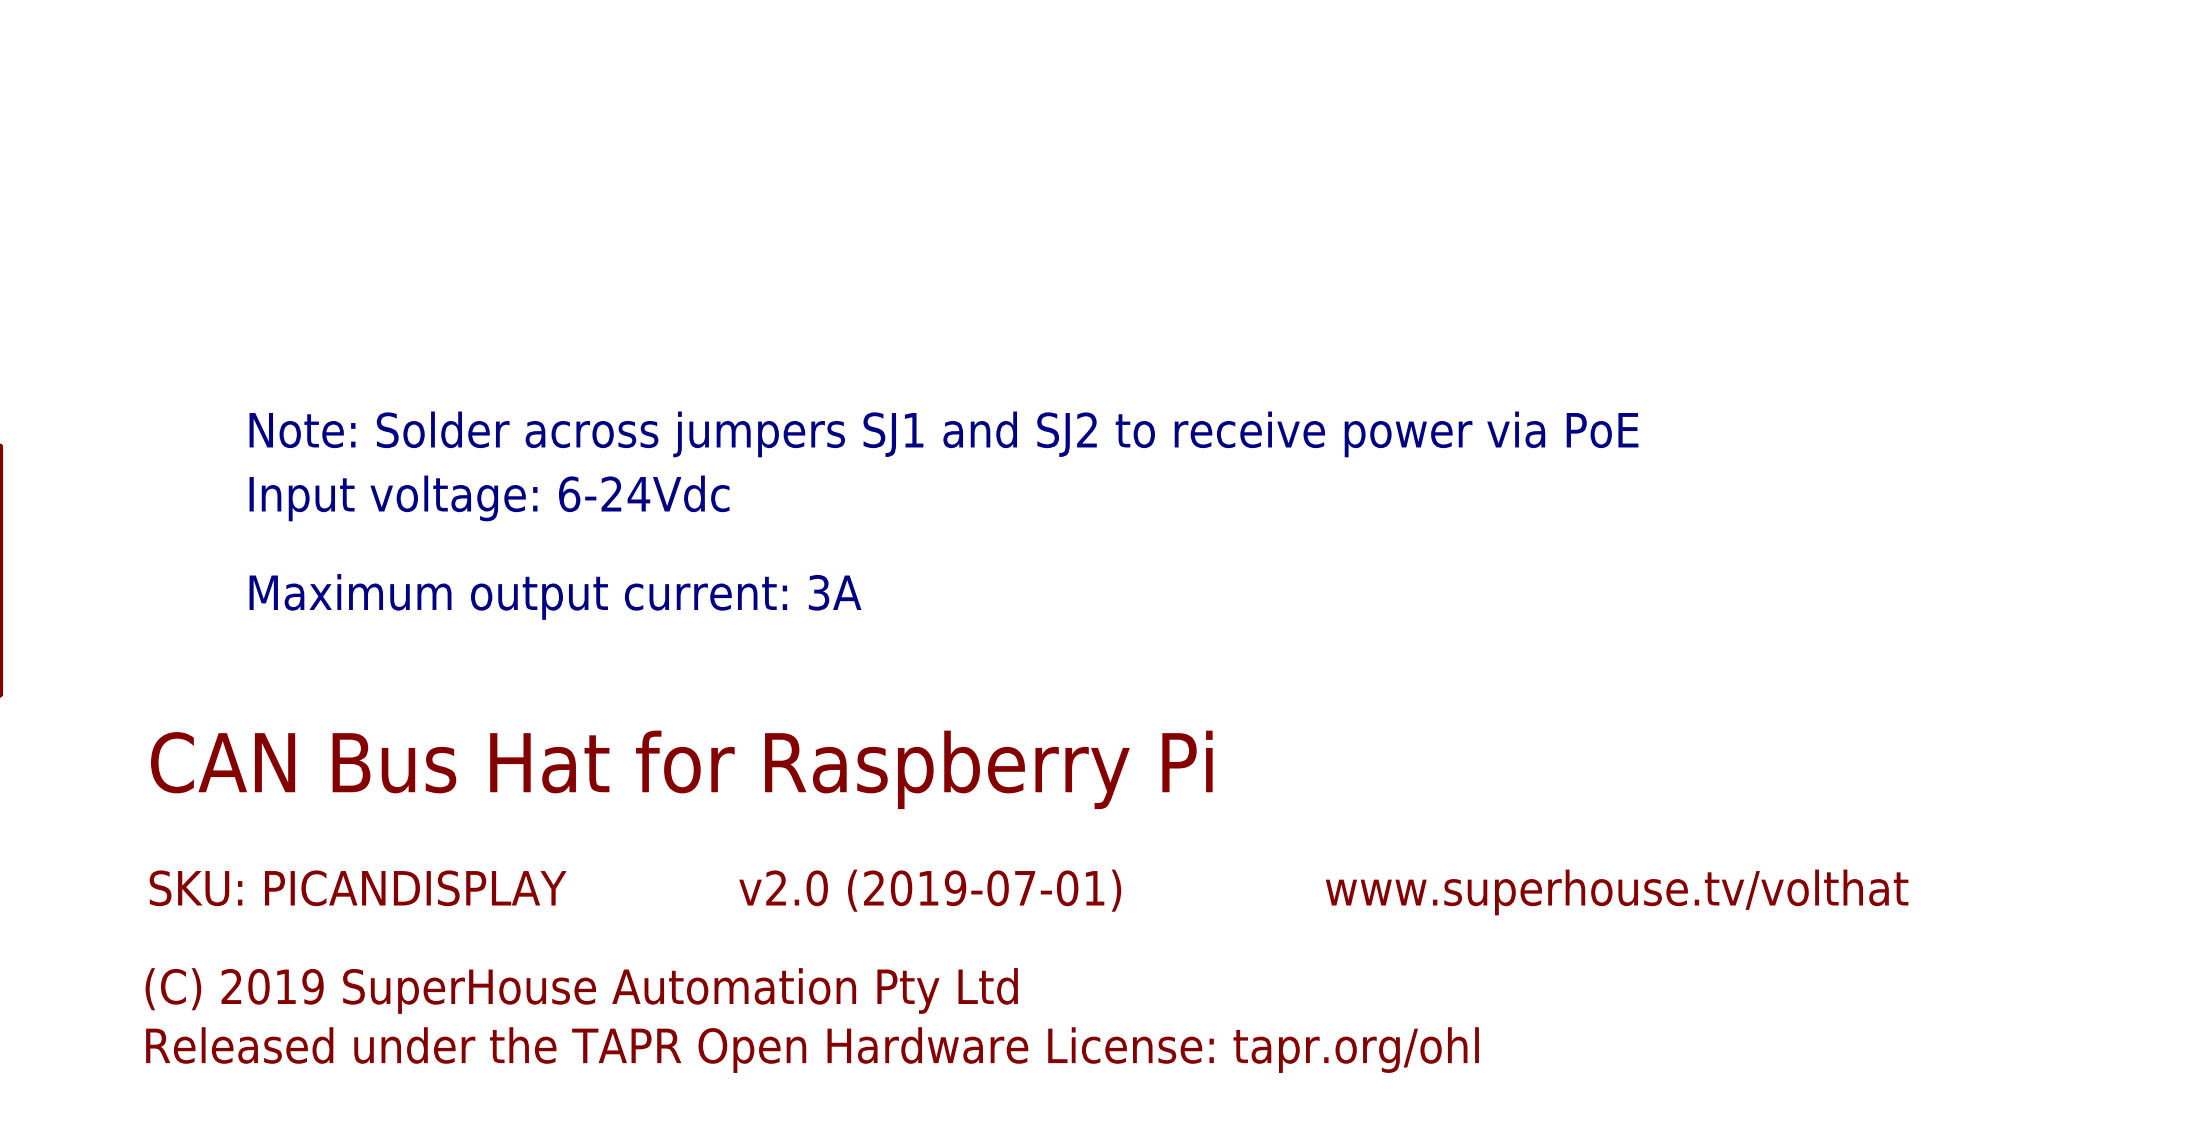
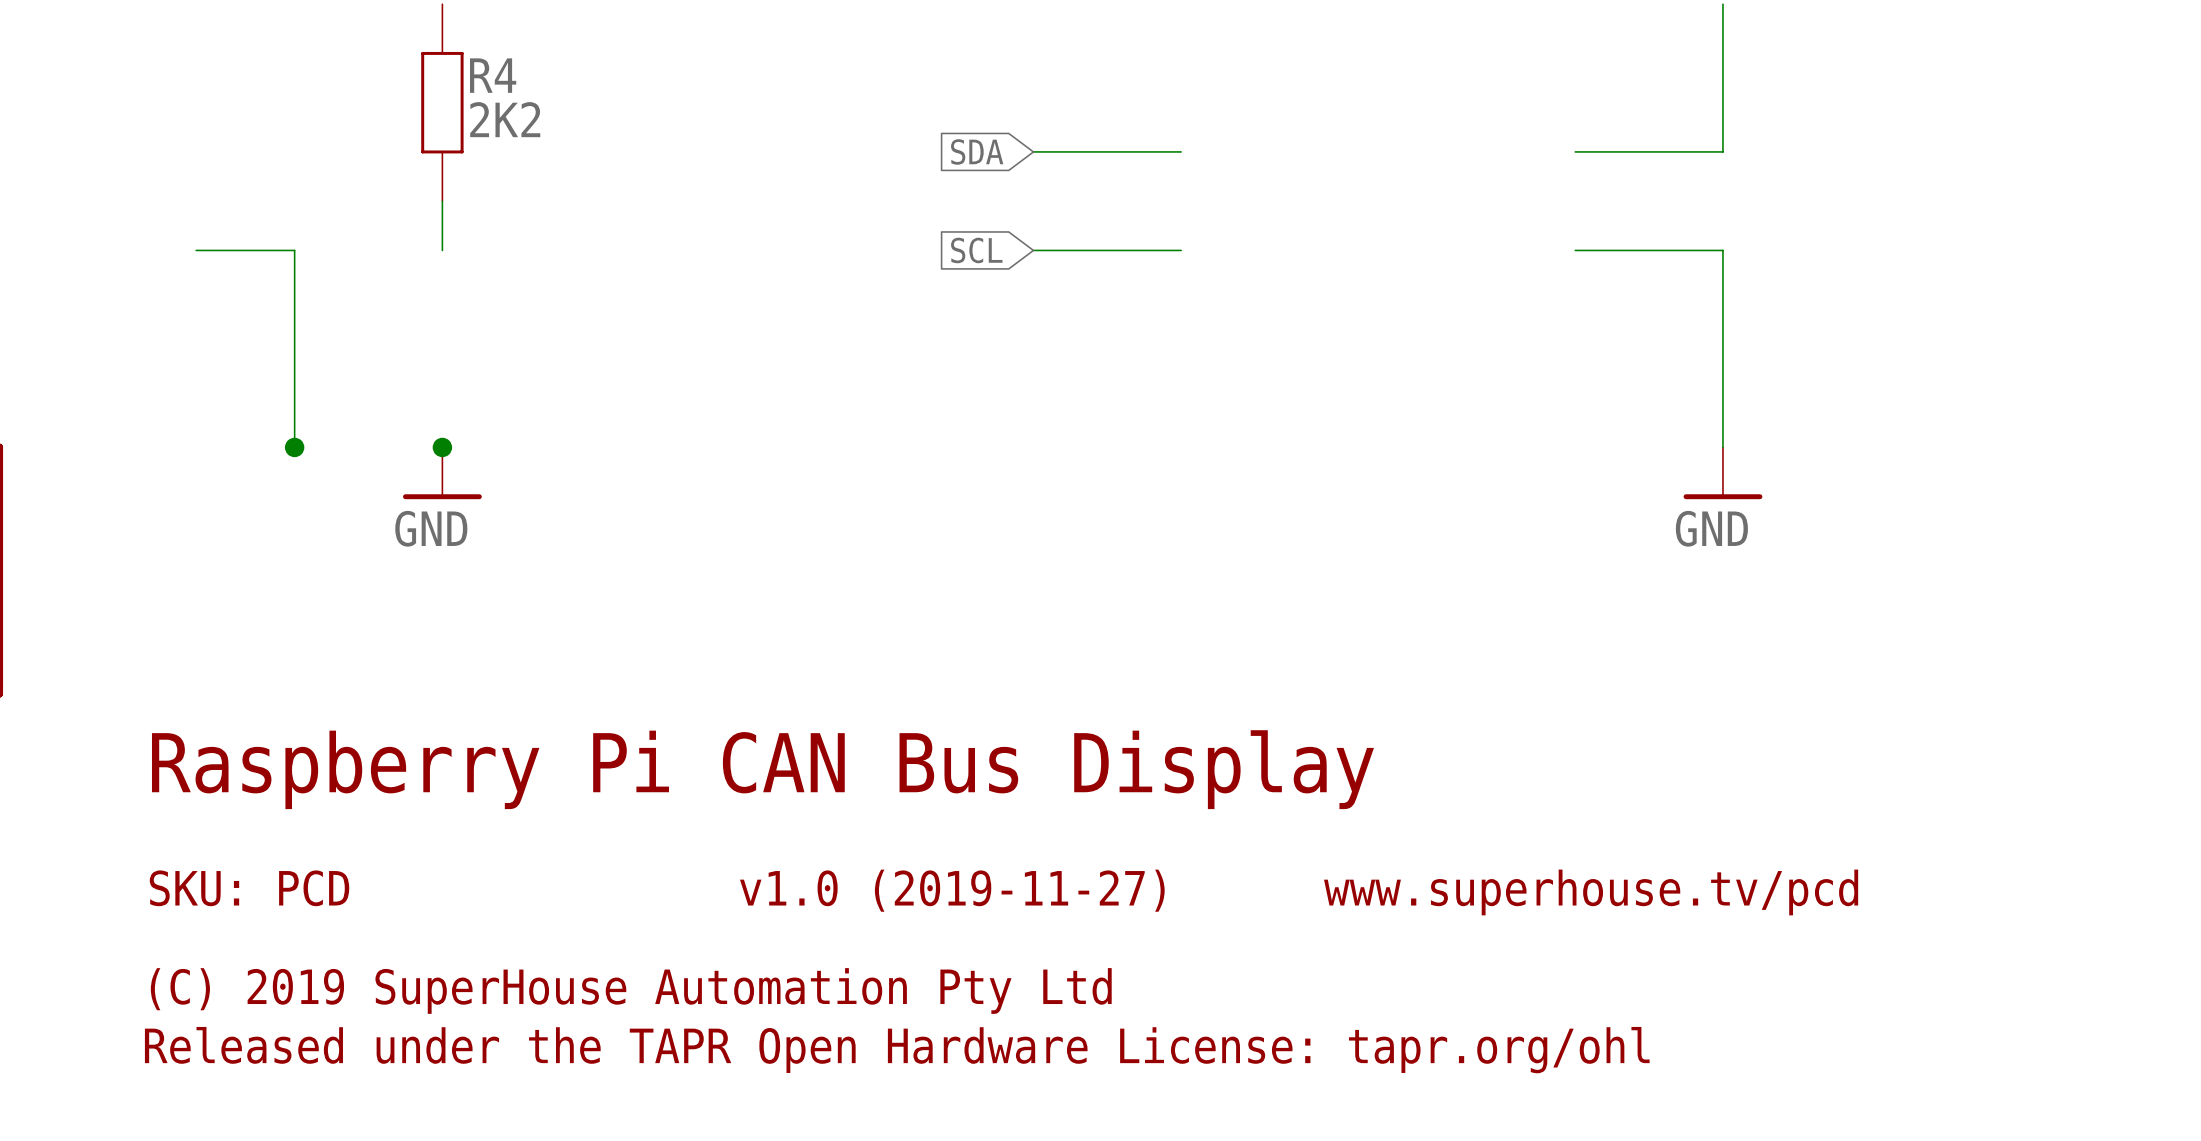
wire: none -> (1722, 4) (1722, 151) (1575, 151)
R4: none -> 2K2 (442, 102)
global label: none -> SDA (977, 151)
wire: none -> (1033, 151) (1181, 151)
wire: none -> (442, 201) (442, 250)
wire: none -> (196, 250) (294, 250) (294, 447)
global label: none -> SCL (976, 250)
wire: none -> (1033, 250) (1181, 250)
wire: none -> (1575, 250) (1722, 250) (1722, 447)
text: Note: Solder across jumpers SJ1 and SJ2 to receive power via PoE (944, 434) -> none
junction: none -> (294, 447)
junction: none -> (442, 447)
power symbol: none -> GND (442, 473)
power symbol: none -> GND (1722, 473)
text: Input voltage: 6-24Vdc (489, 498) -> none
text: Maximum output current: 3A (555, 596) -> none
text: CAN Bus Hat for Raspberry Pi (681, 769) -> Raspberry Pi CAN Bus Display (762, 769)
text: SKU: PICANDISPLAY (358, 888) -> SKU: PCD (249, 888)
text: v2.0 (2019-07-01) (930, 890) -> v1.0 (2019-11-27) (952, 890)
text: www.superhouse.tv/volthat (1617, 892) -> www.superhouse.tv/pcd (1591, 892)

